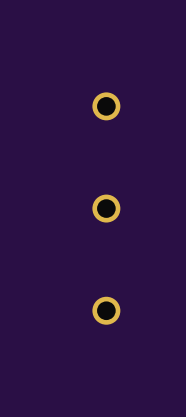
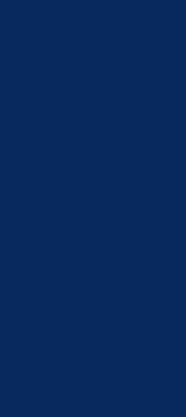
part: (106, 106) -> none
part: (106, 208) -> none
part: (106, 310) -> none

